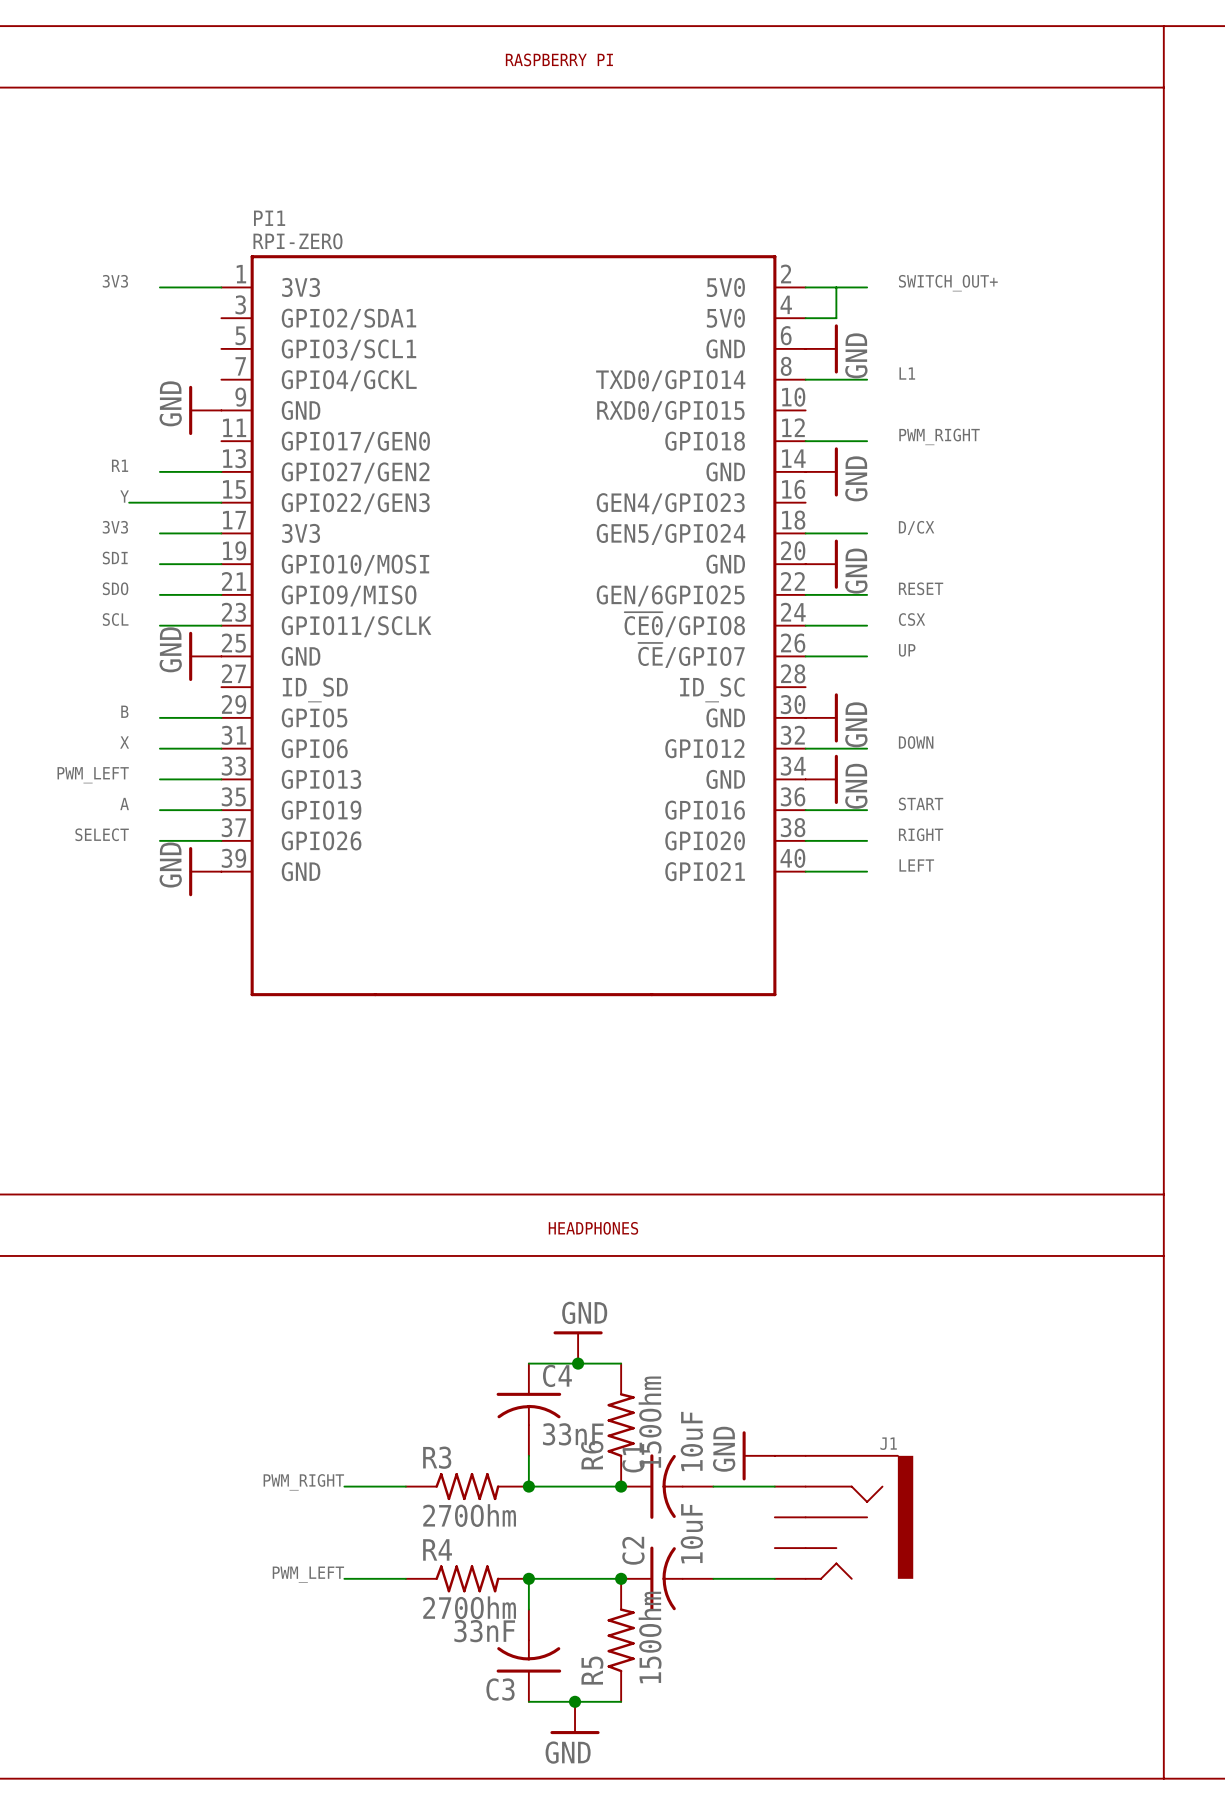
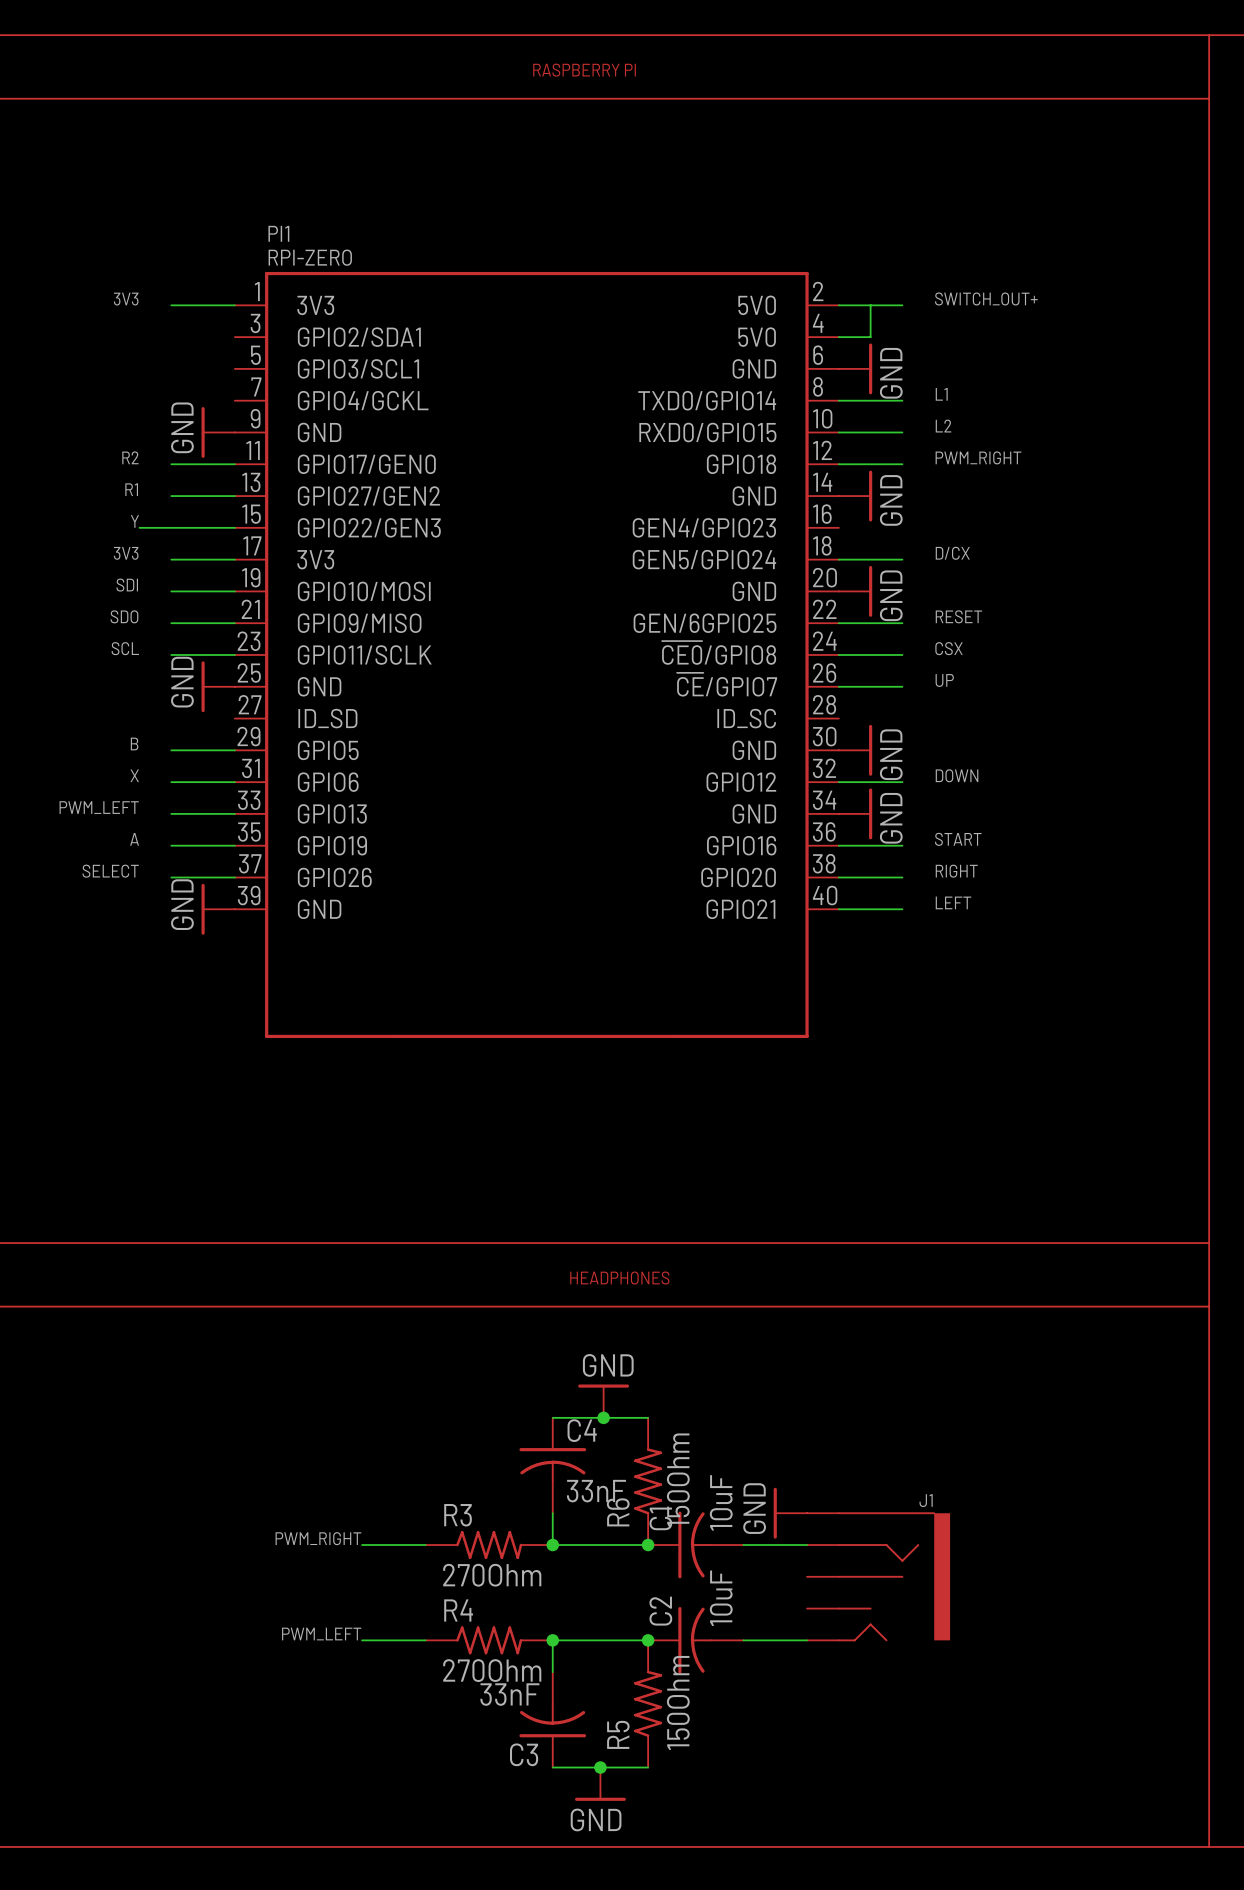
label: none -> L2 (943, 426)
wire: none -> (838, 432) (902, 432)
label: none -> R2 (130, 457)
wire: none -> (171, 464) (234, 464)

